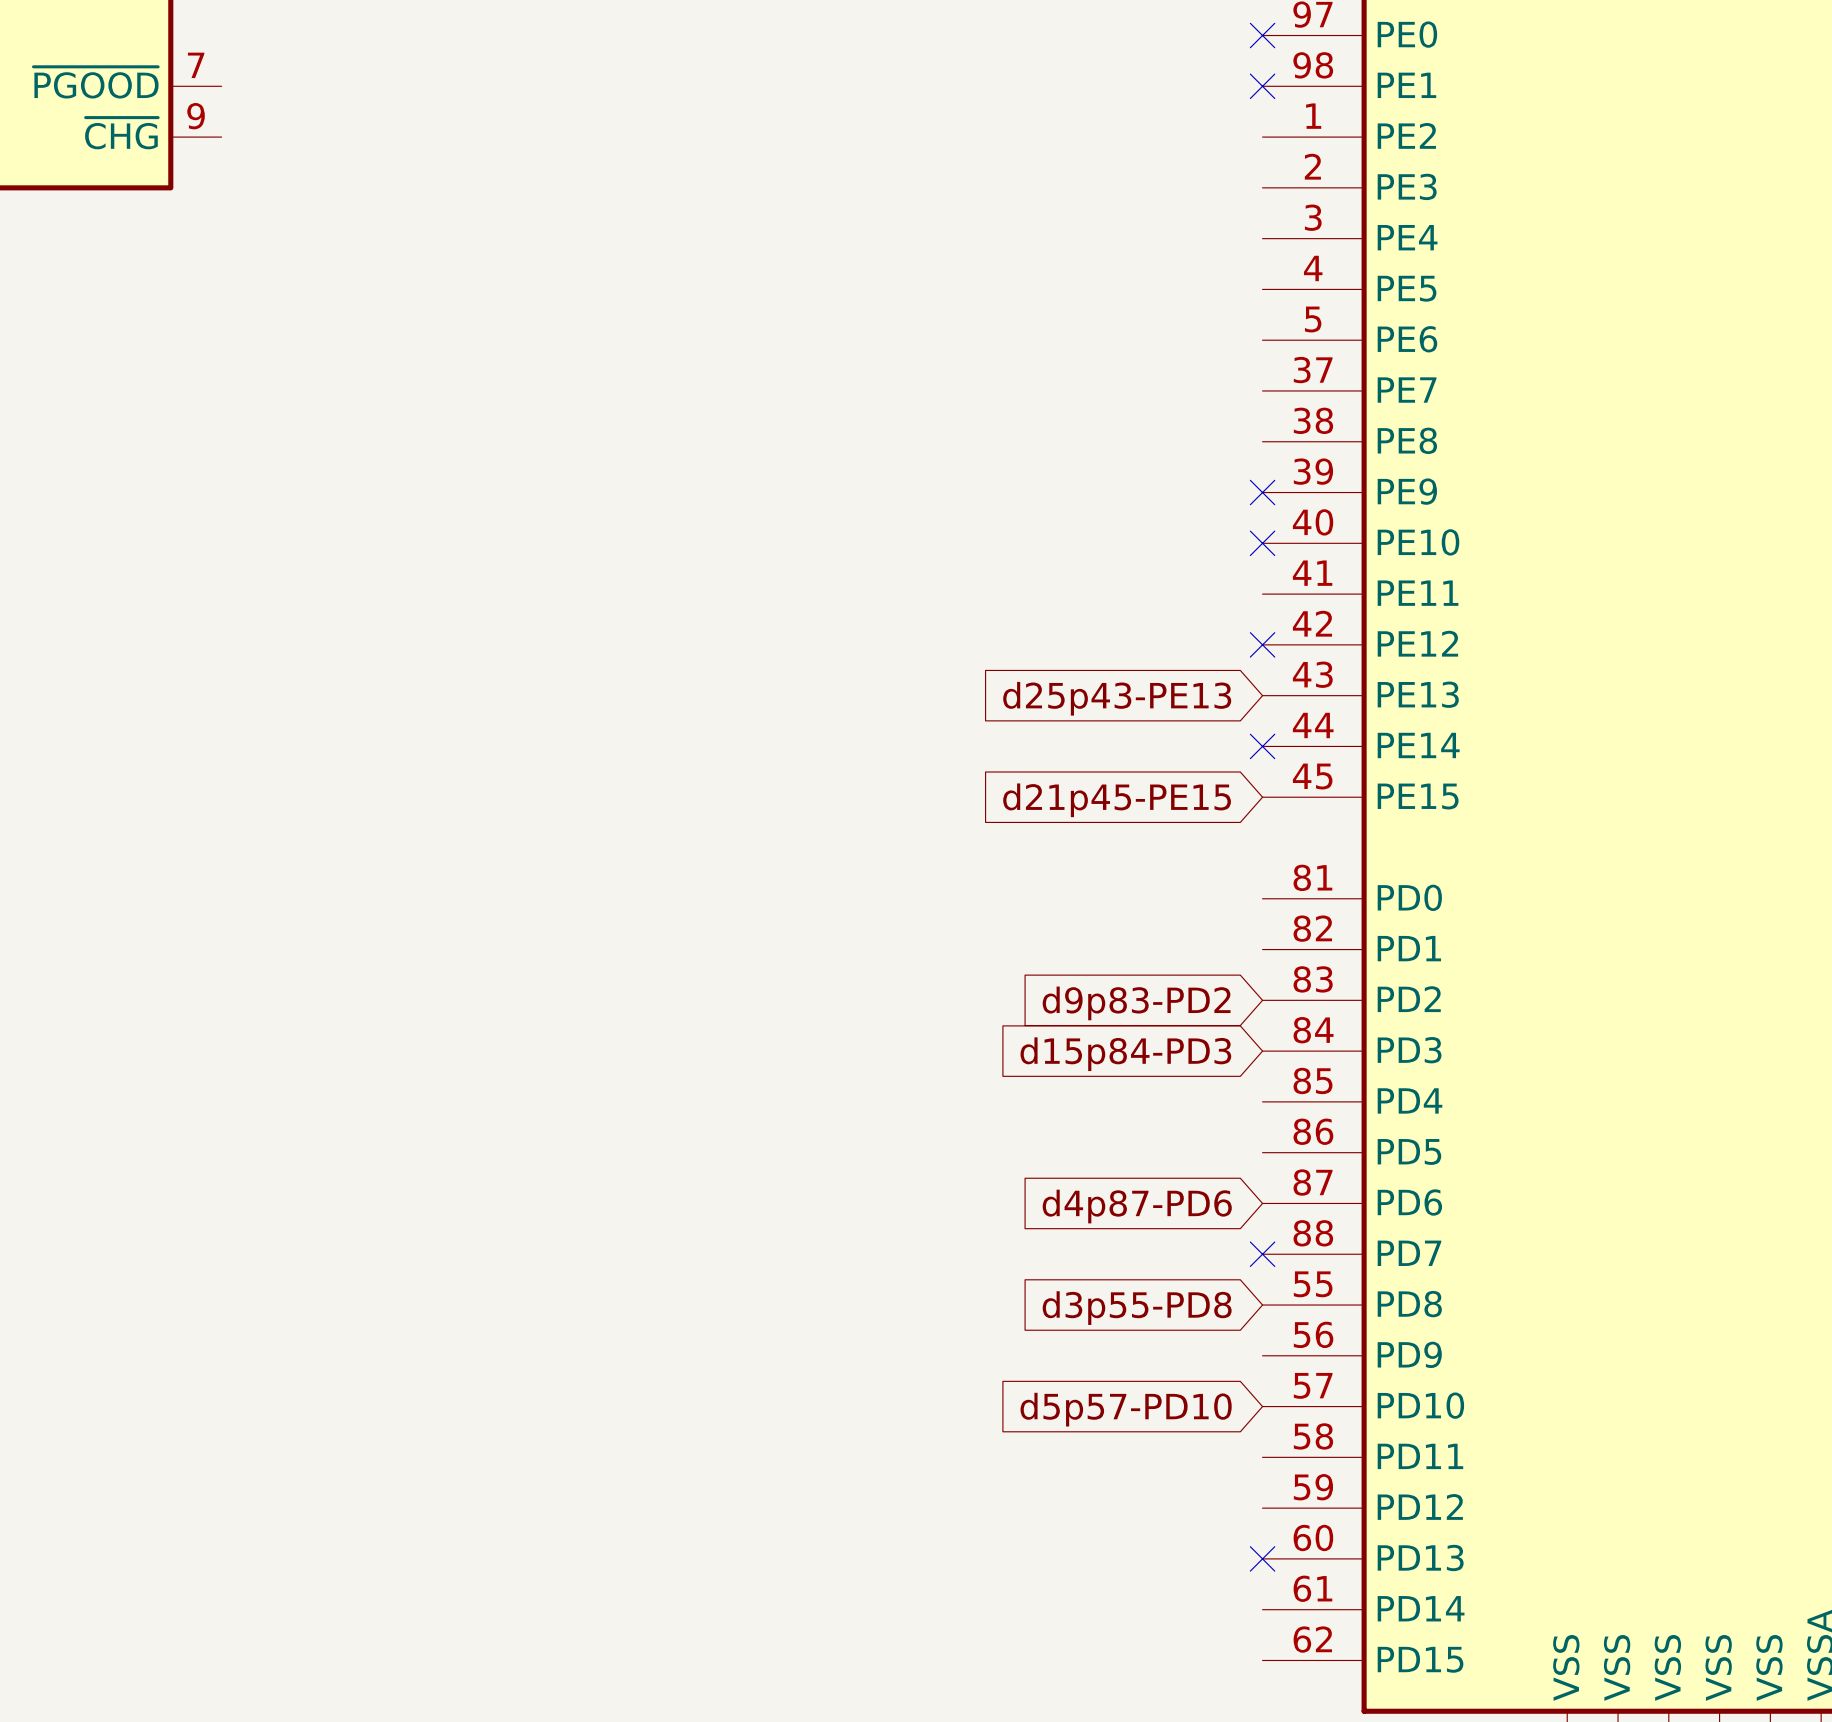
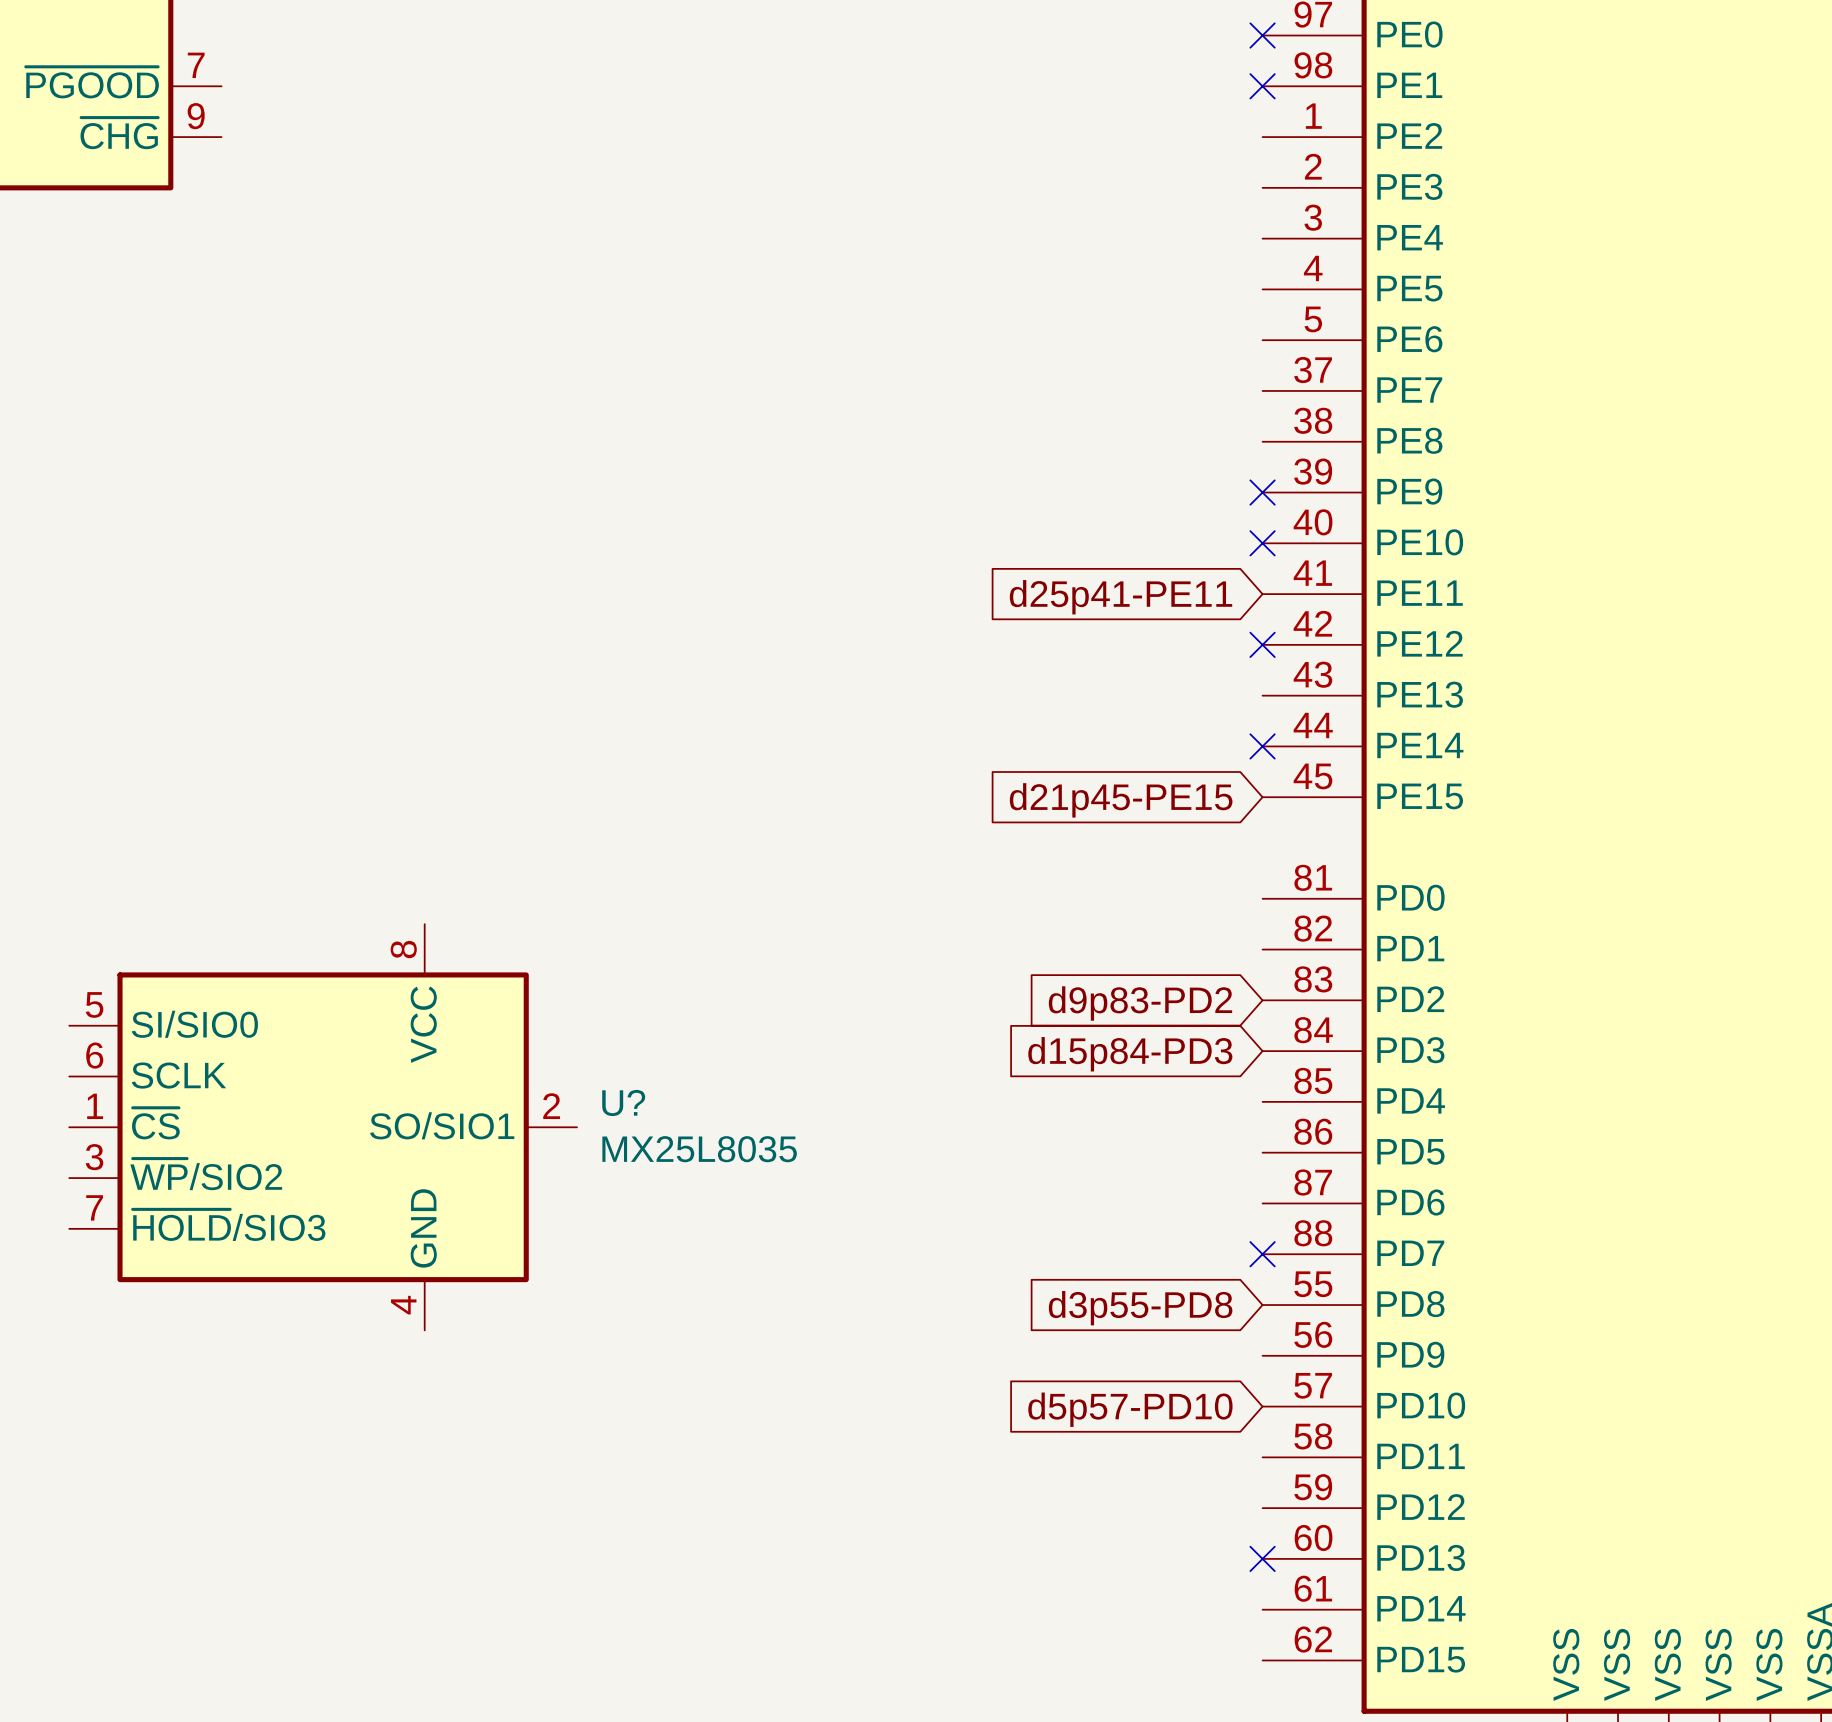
global label: none -> d25p41-PE11 (1121, 597)
global label: d25p43-PE13 (1117, 698) -> none
U?: none -> MX25L8035 (323, 1127)
global label: d4p87-PD6 (1137, 1206) -> none

